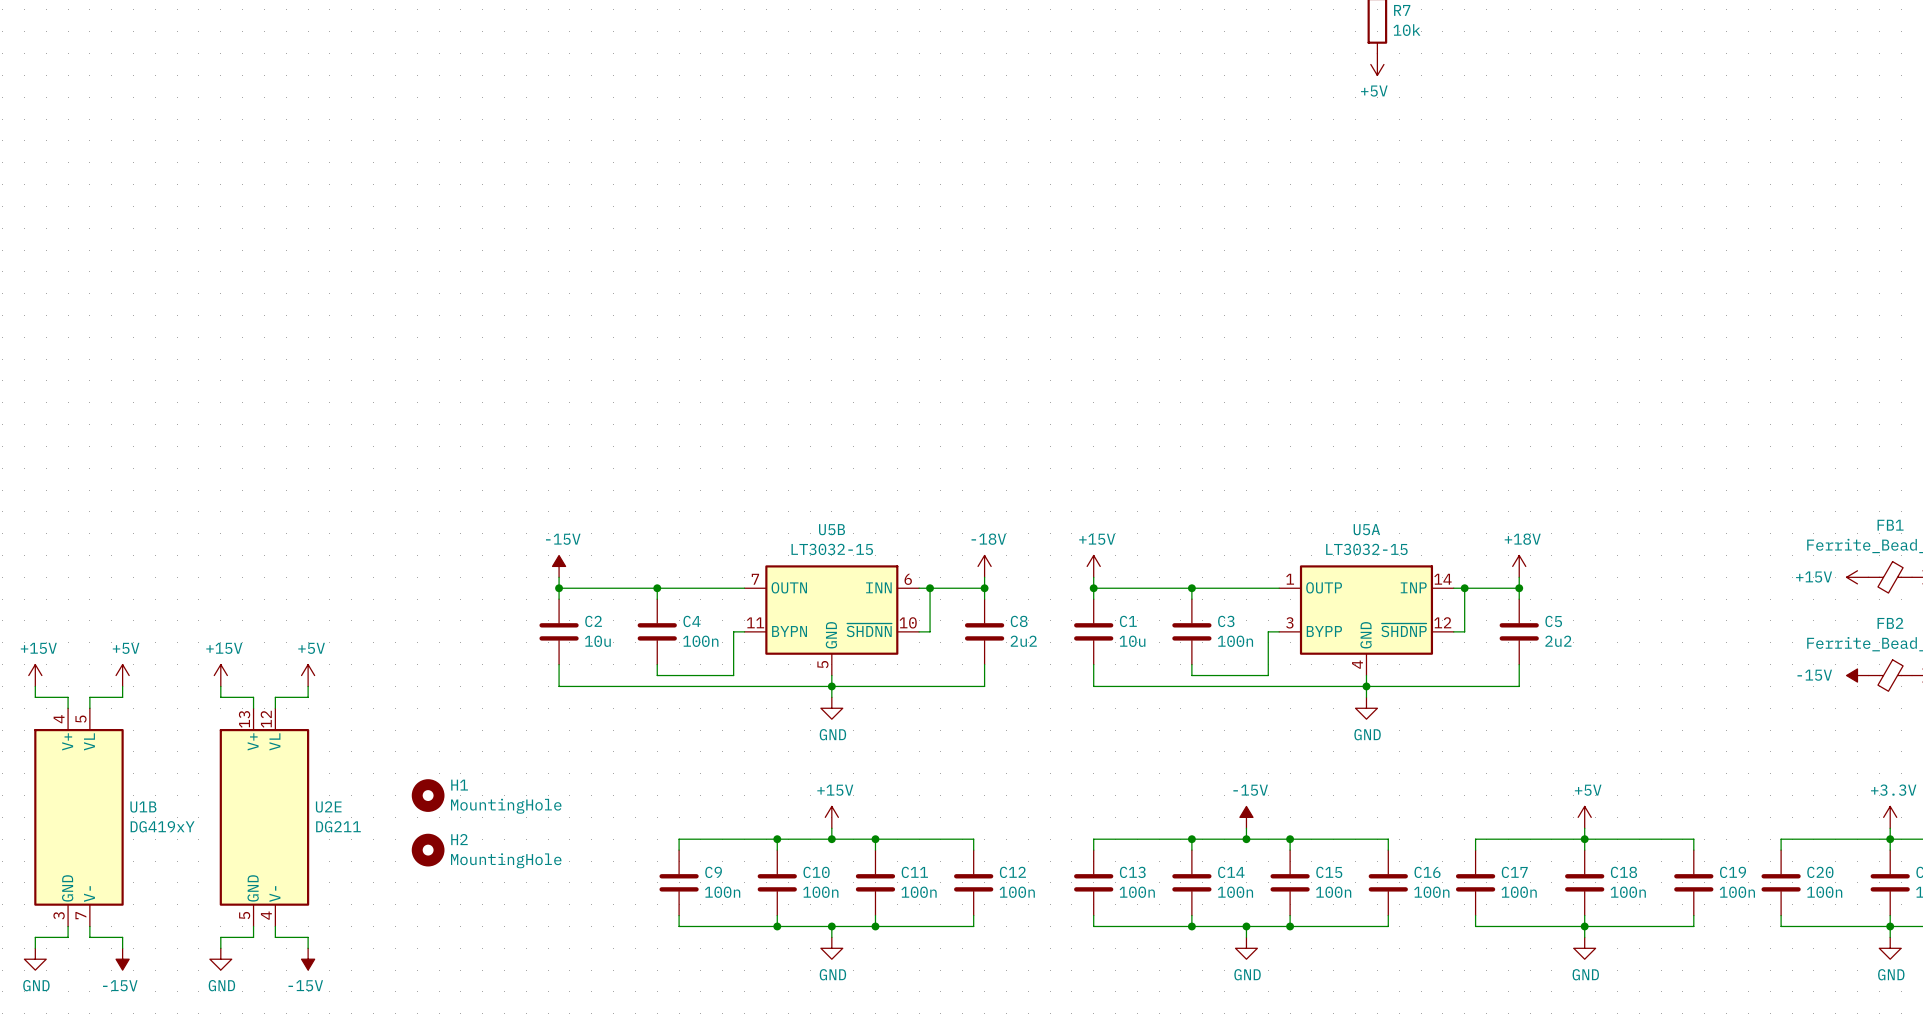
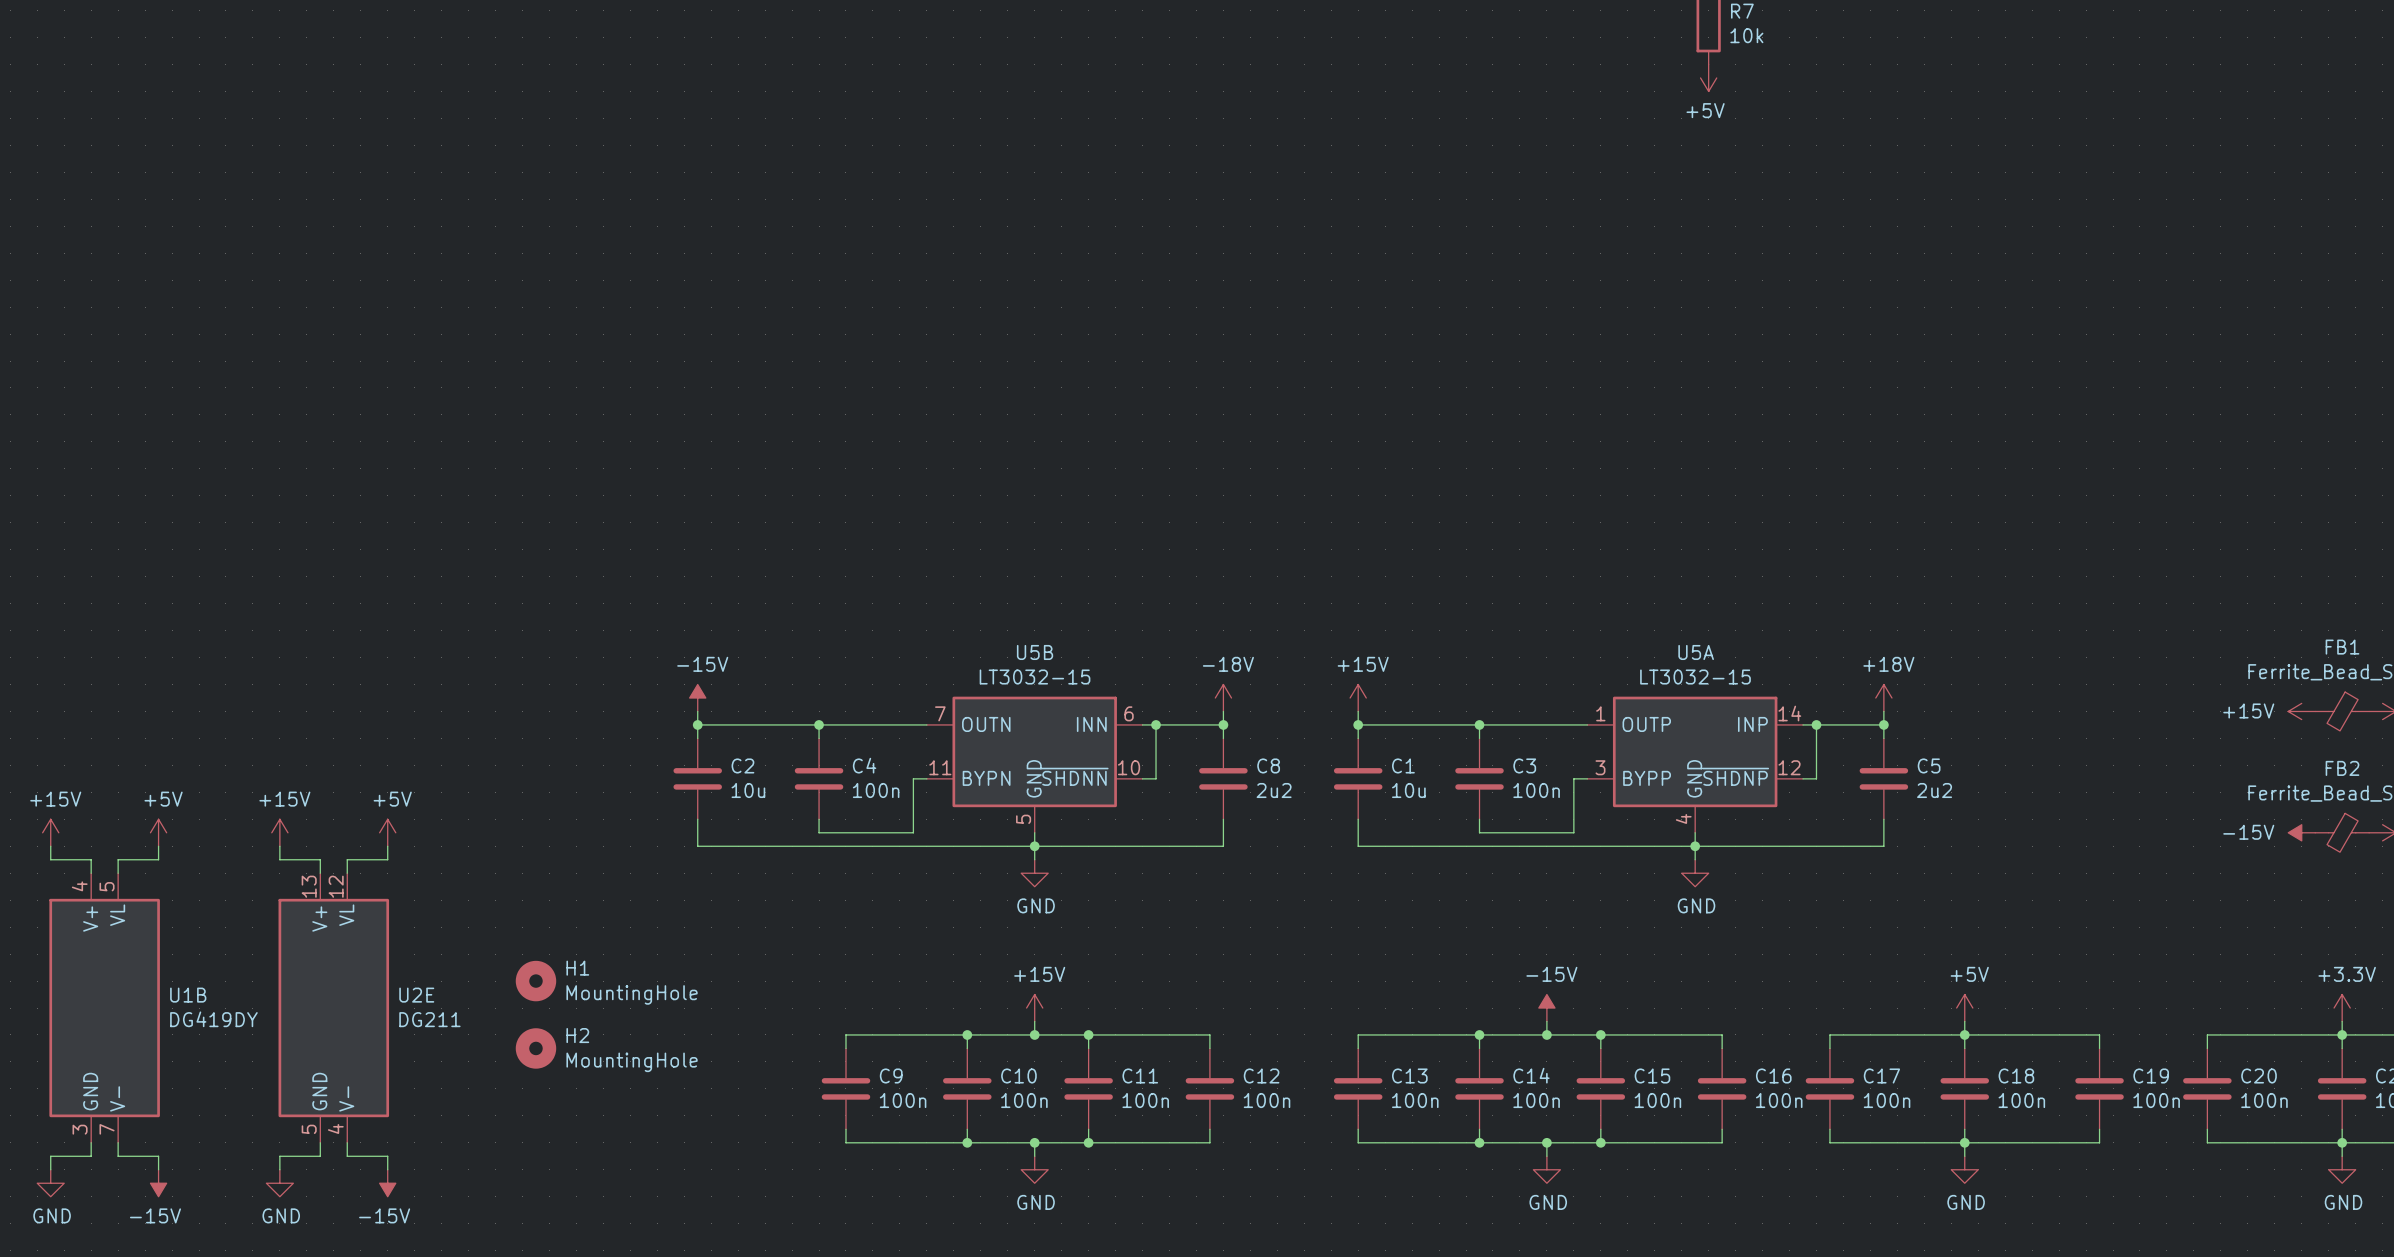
U1B value: DG419xY (162, 826) -> DG419DY (213, 1019)

